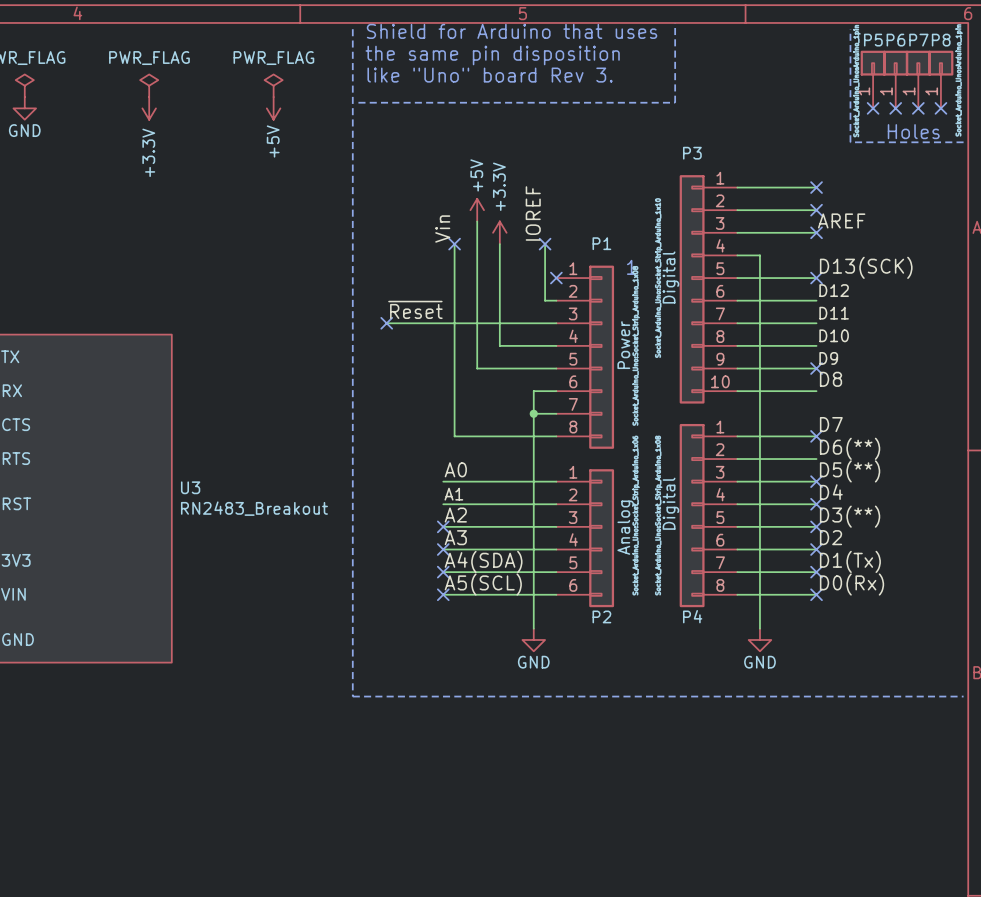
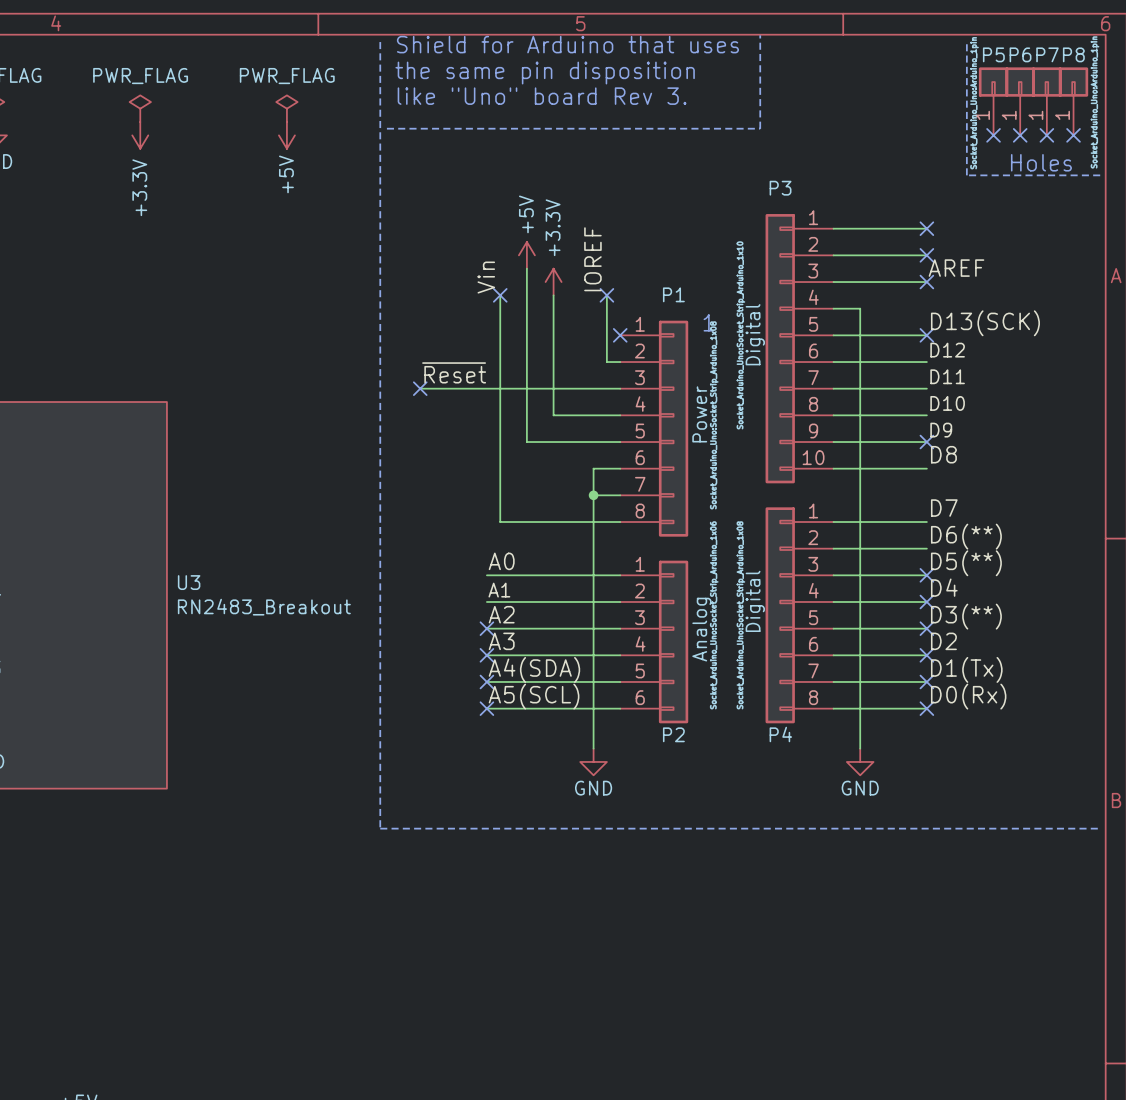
no-connect mark: (816, 436) -> none

